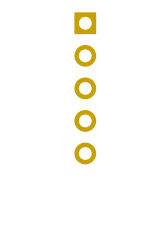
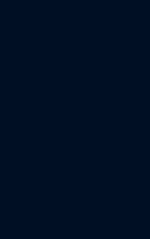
part: (85, 88) -> none

